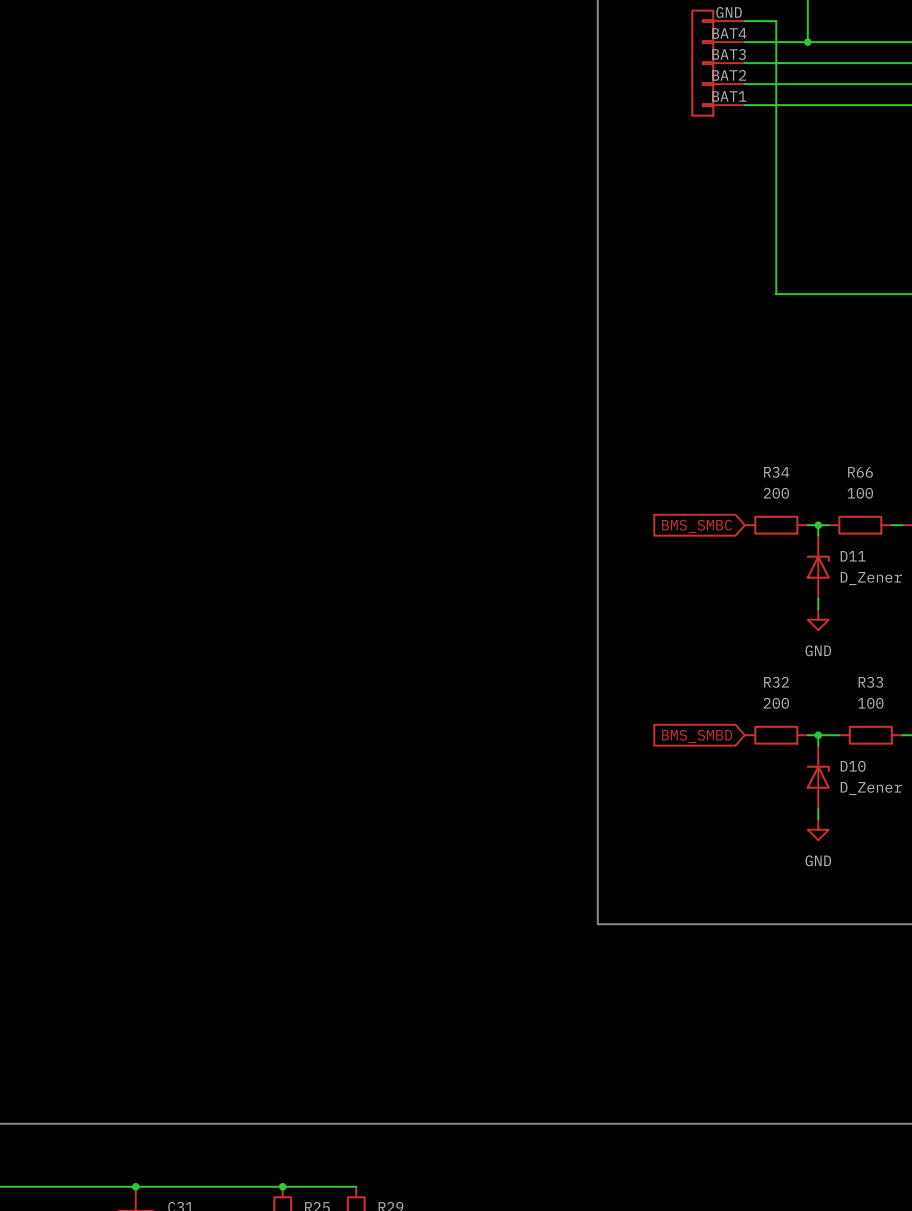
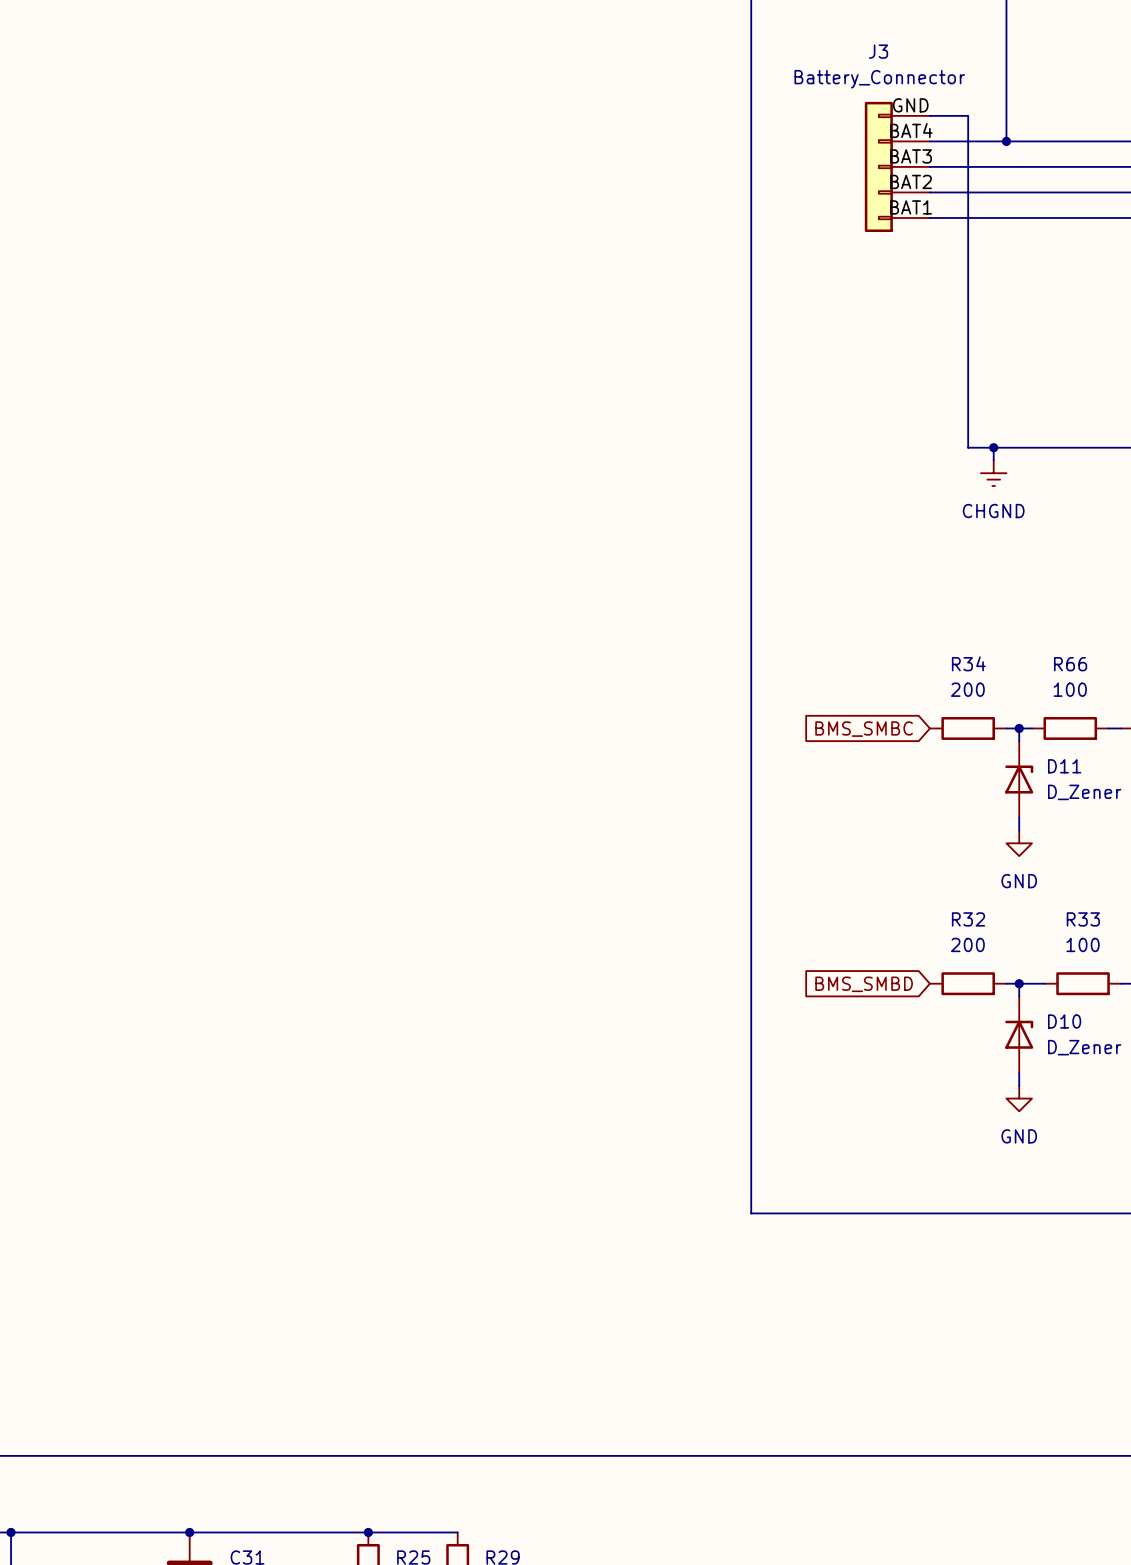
wire: none -> (993, 447) (993, 460)
junction: none -> (993, 447)
power symbol: none -> CHGND (993, 473)

